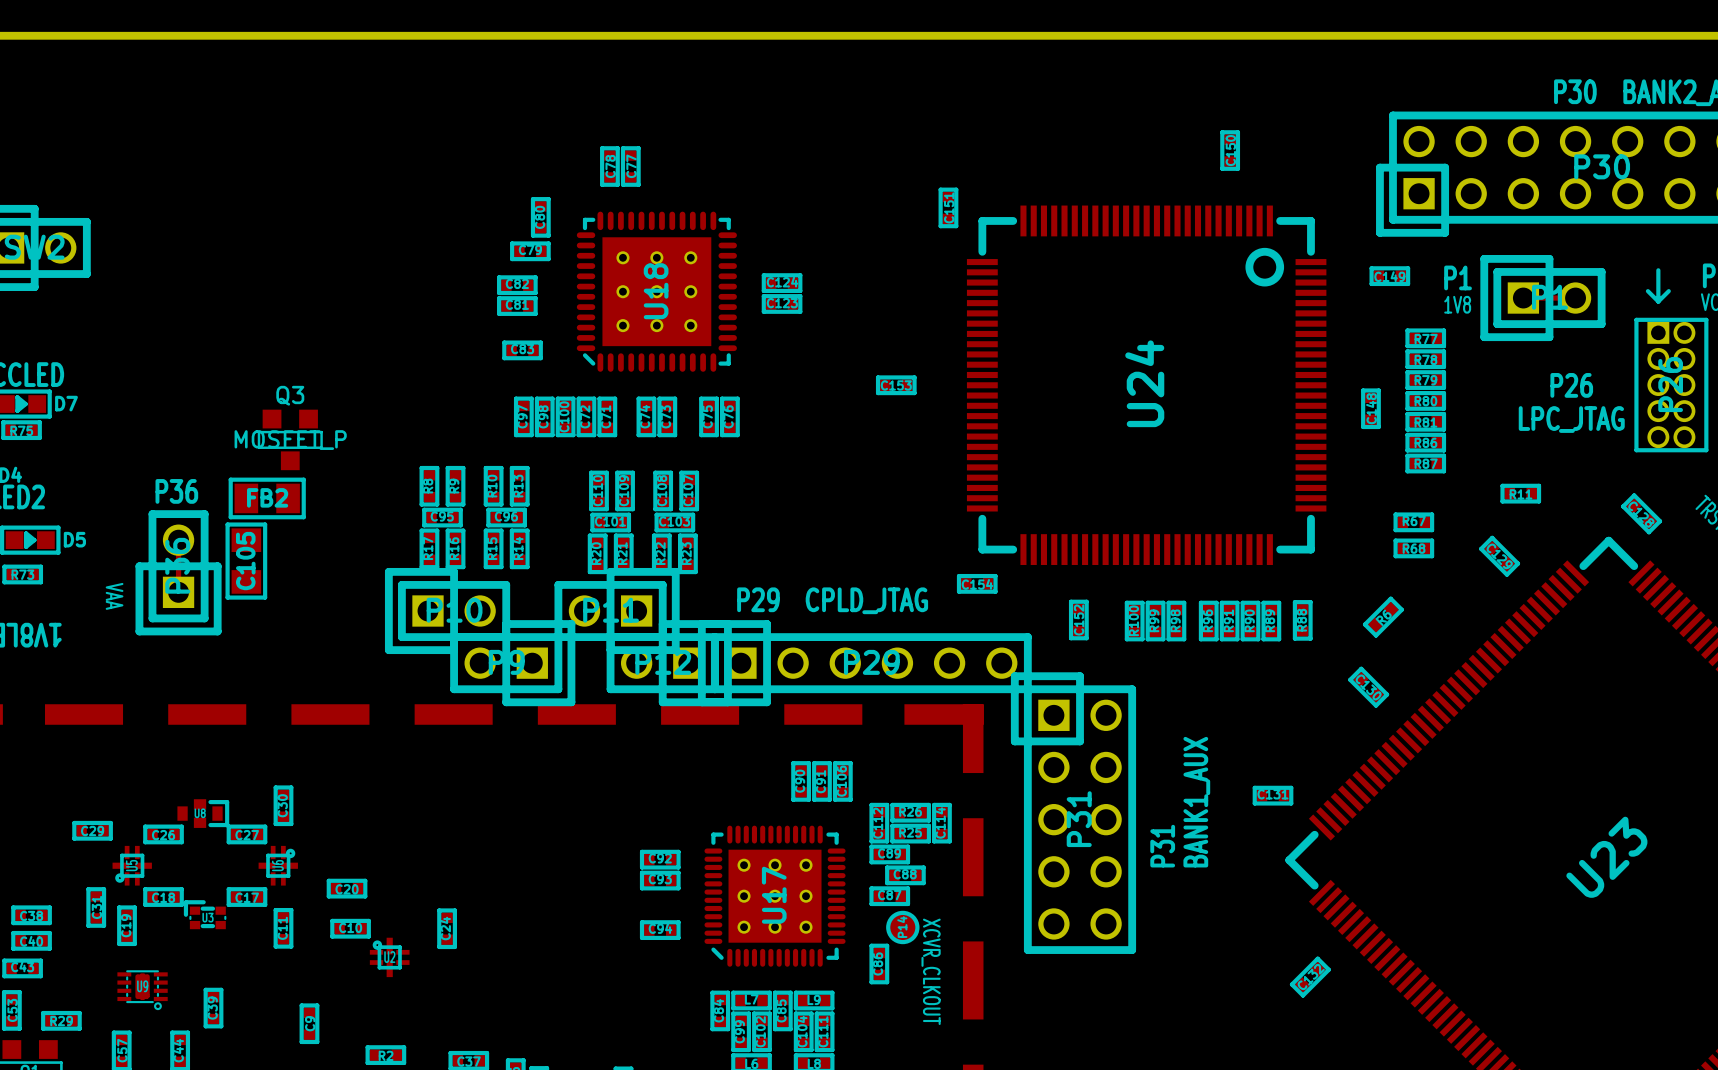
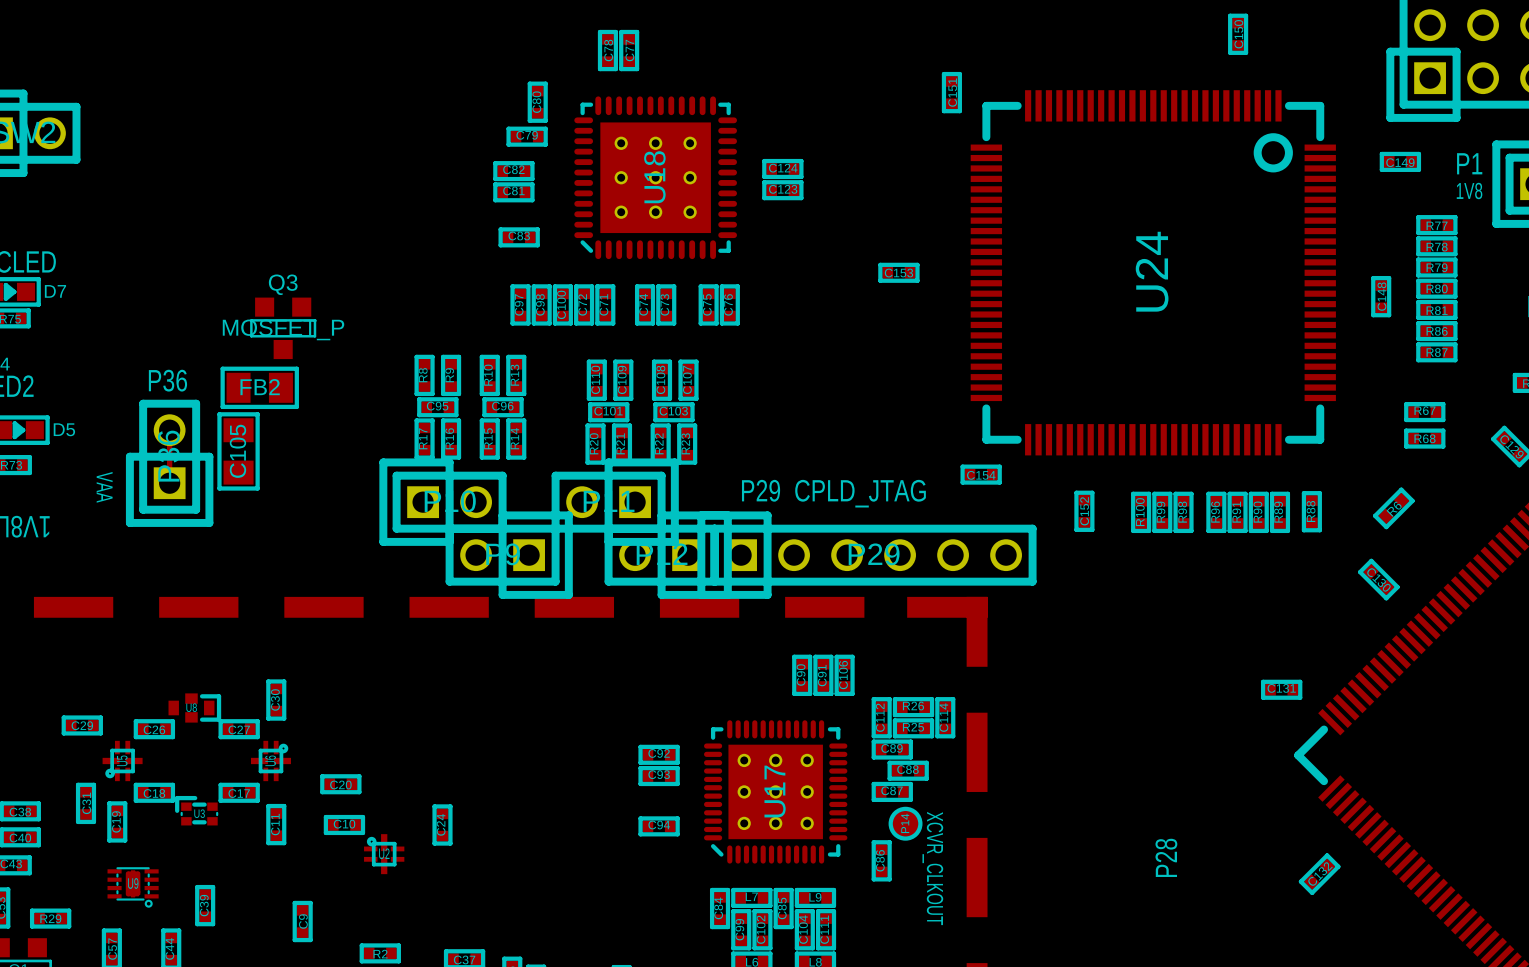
text: BANK1_AUX (1196, 802) -> none
P31: (1073, 813) -> none
text: P31 (1162, 846) -> none
text: none -> P28 (1166, 857)

